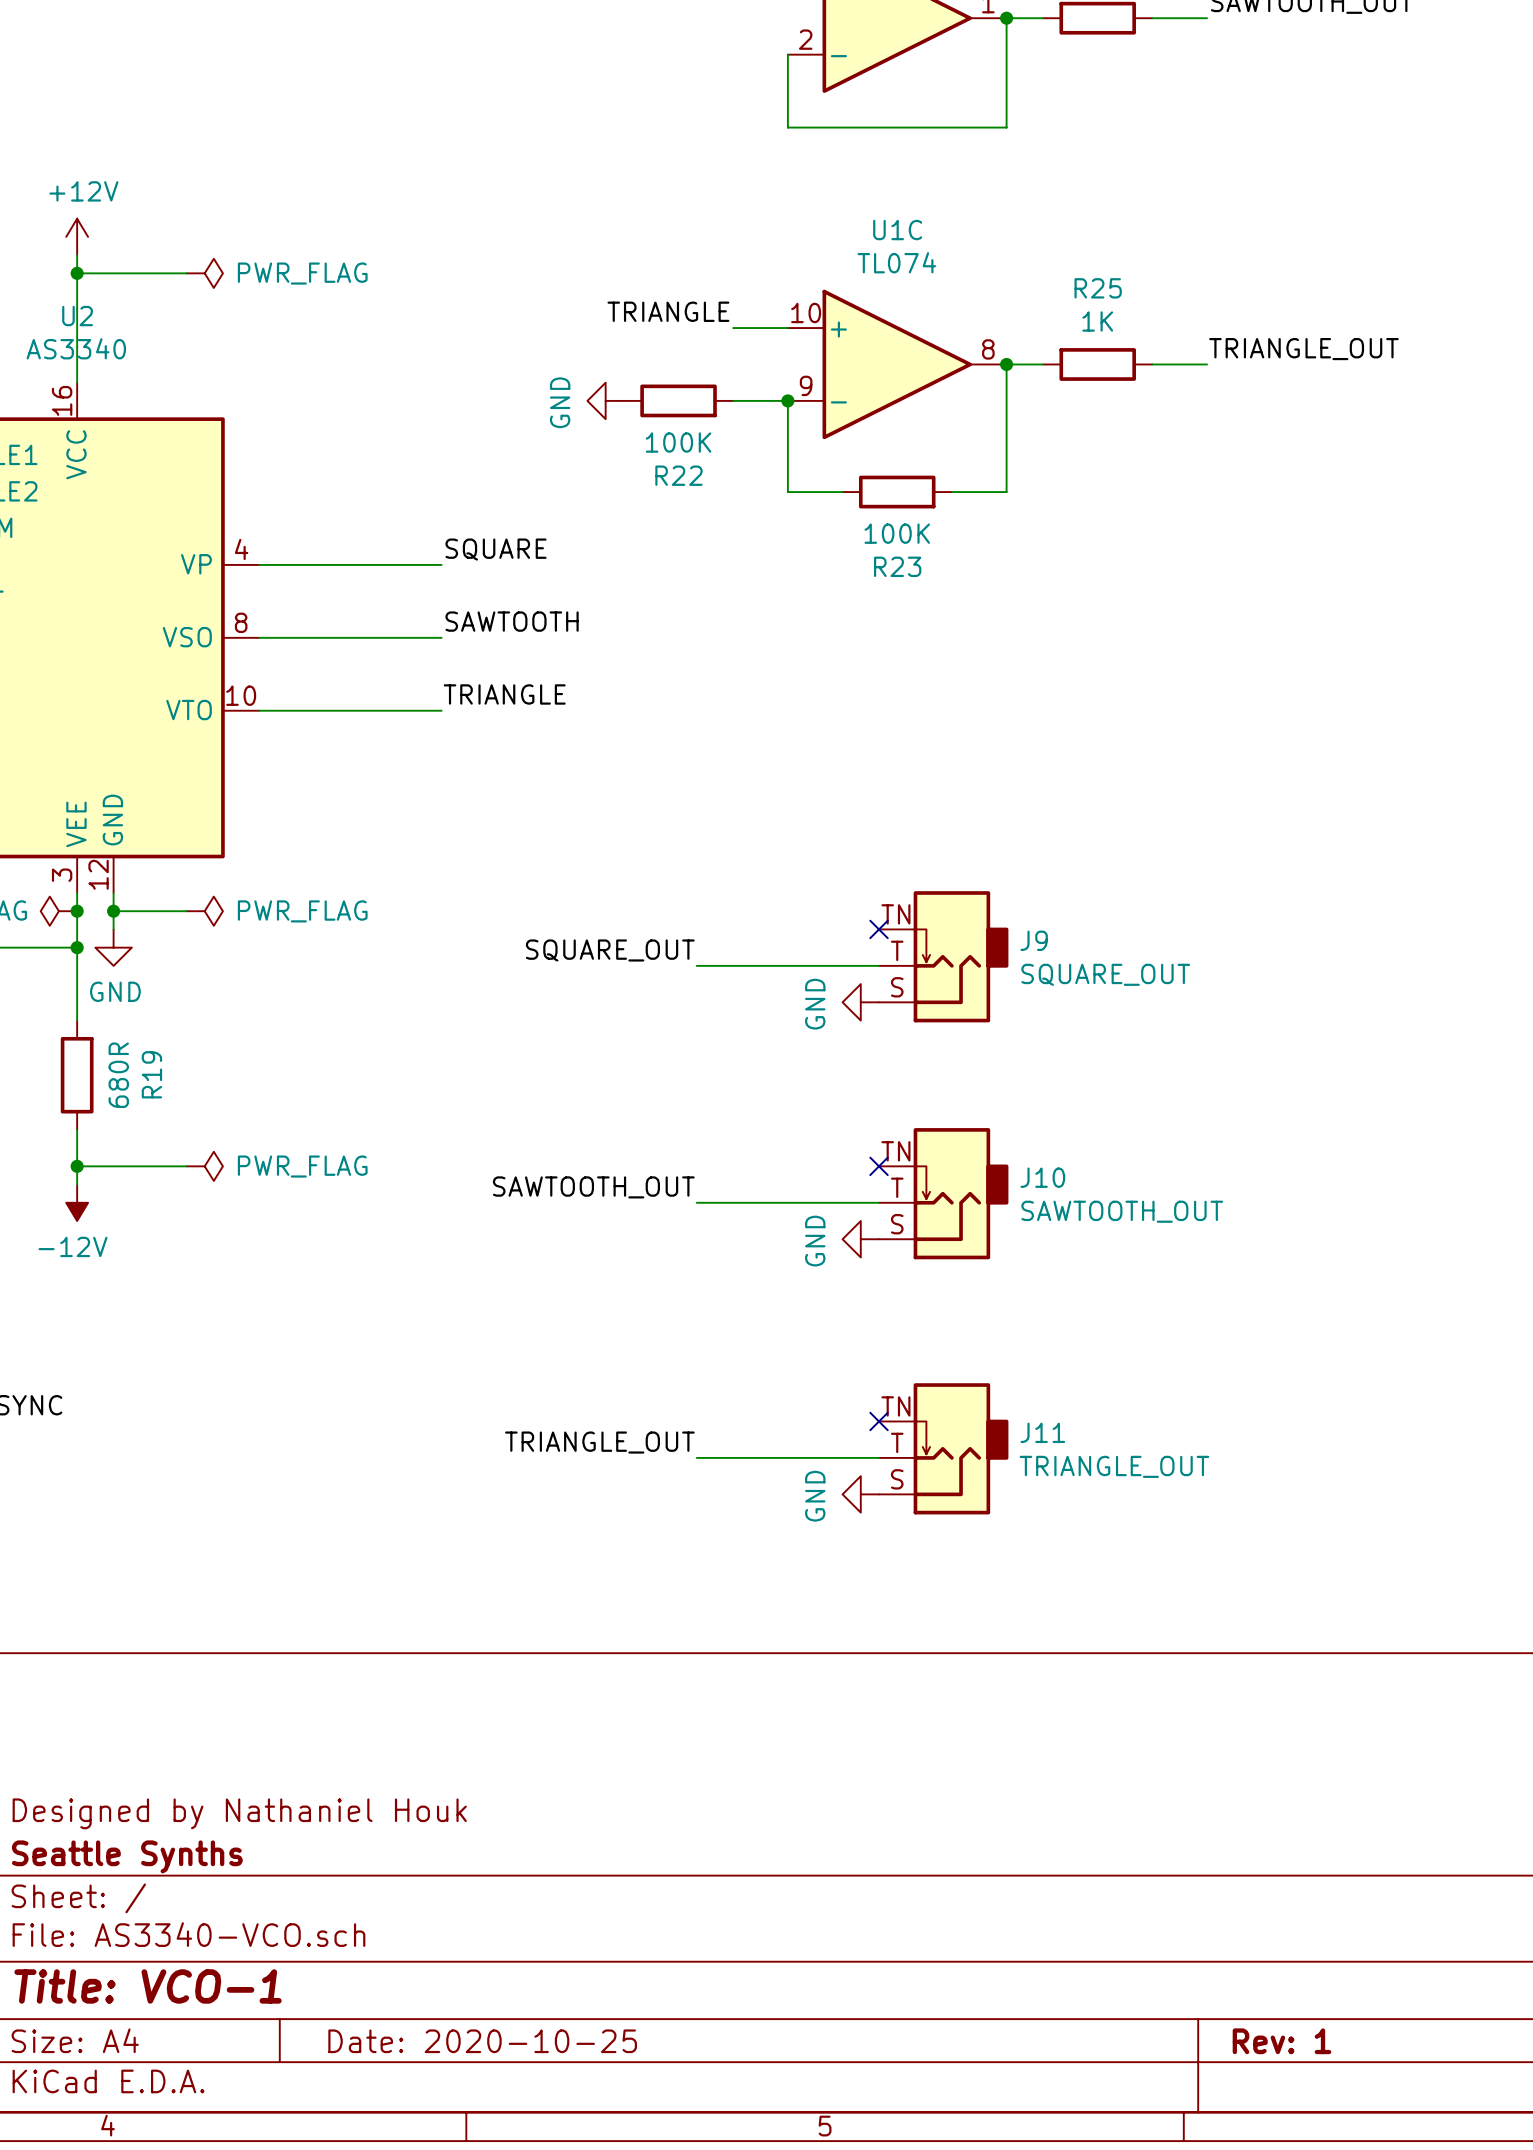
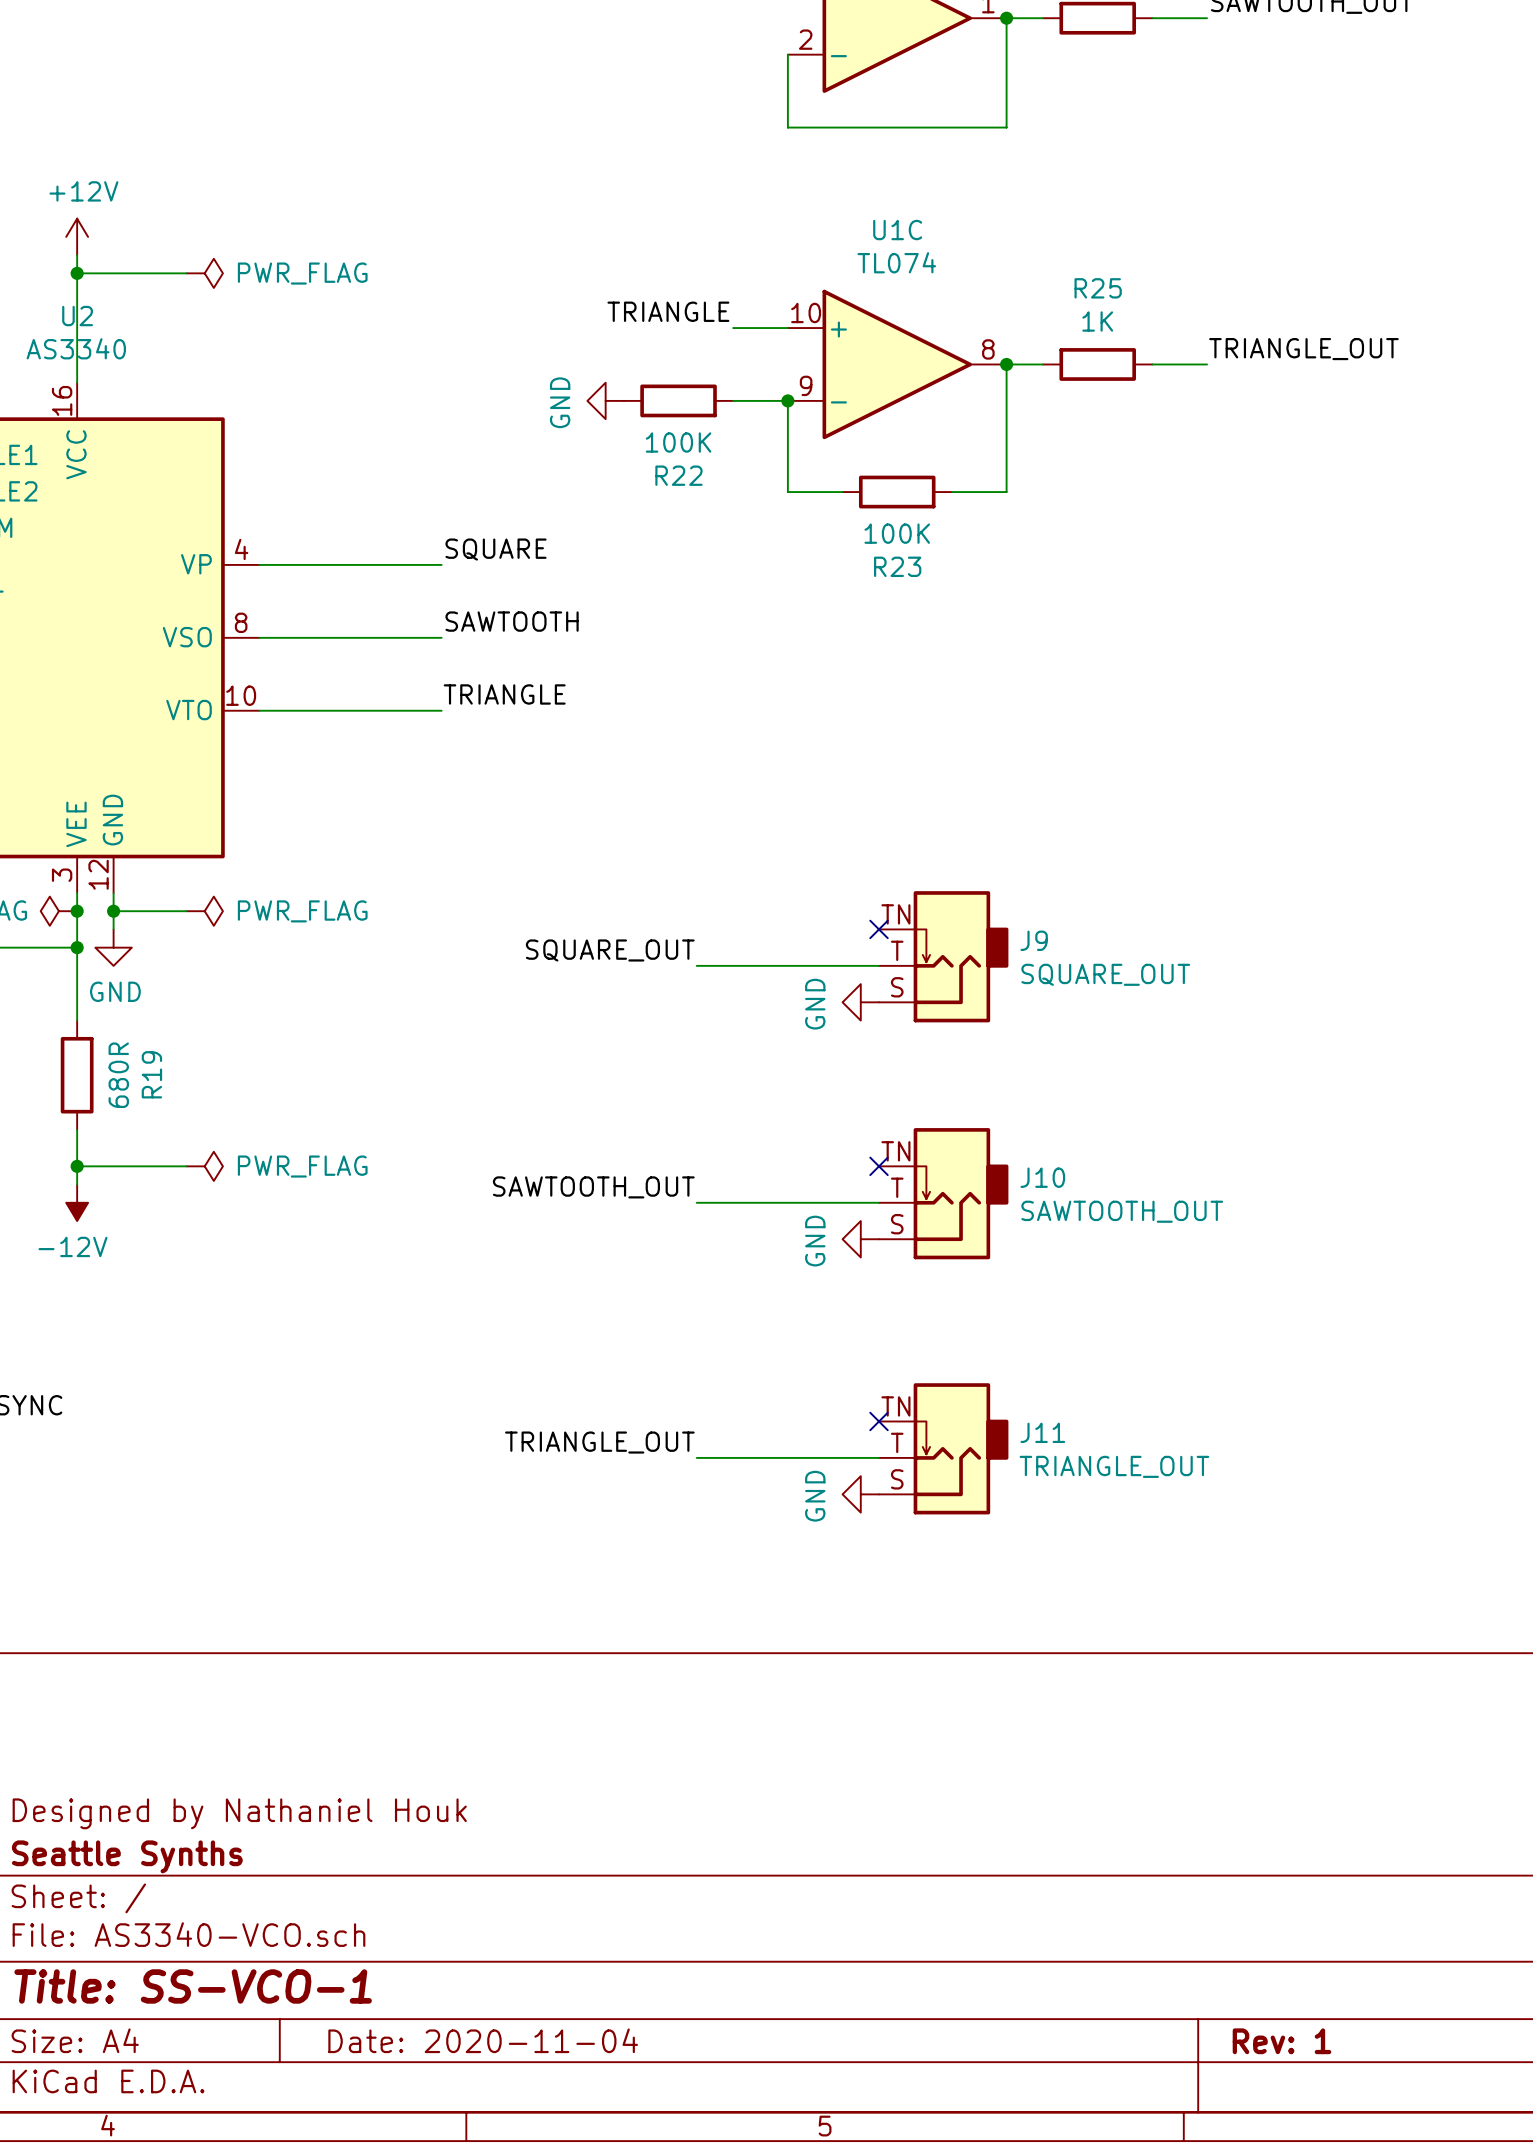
title block: Title: VCO-1 (148, 1986) -> Title: SS-VCO-1 (193, 1986)
title block: Date: 2020-10-25 (482, 2041) -> Date: 2020-11-04 (483, 2040)

